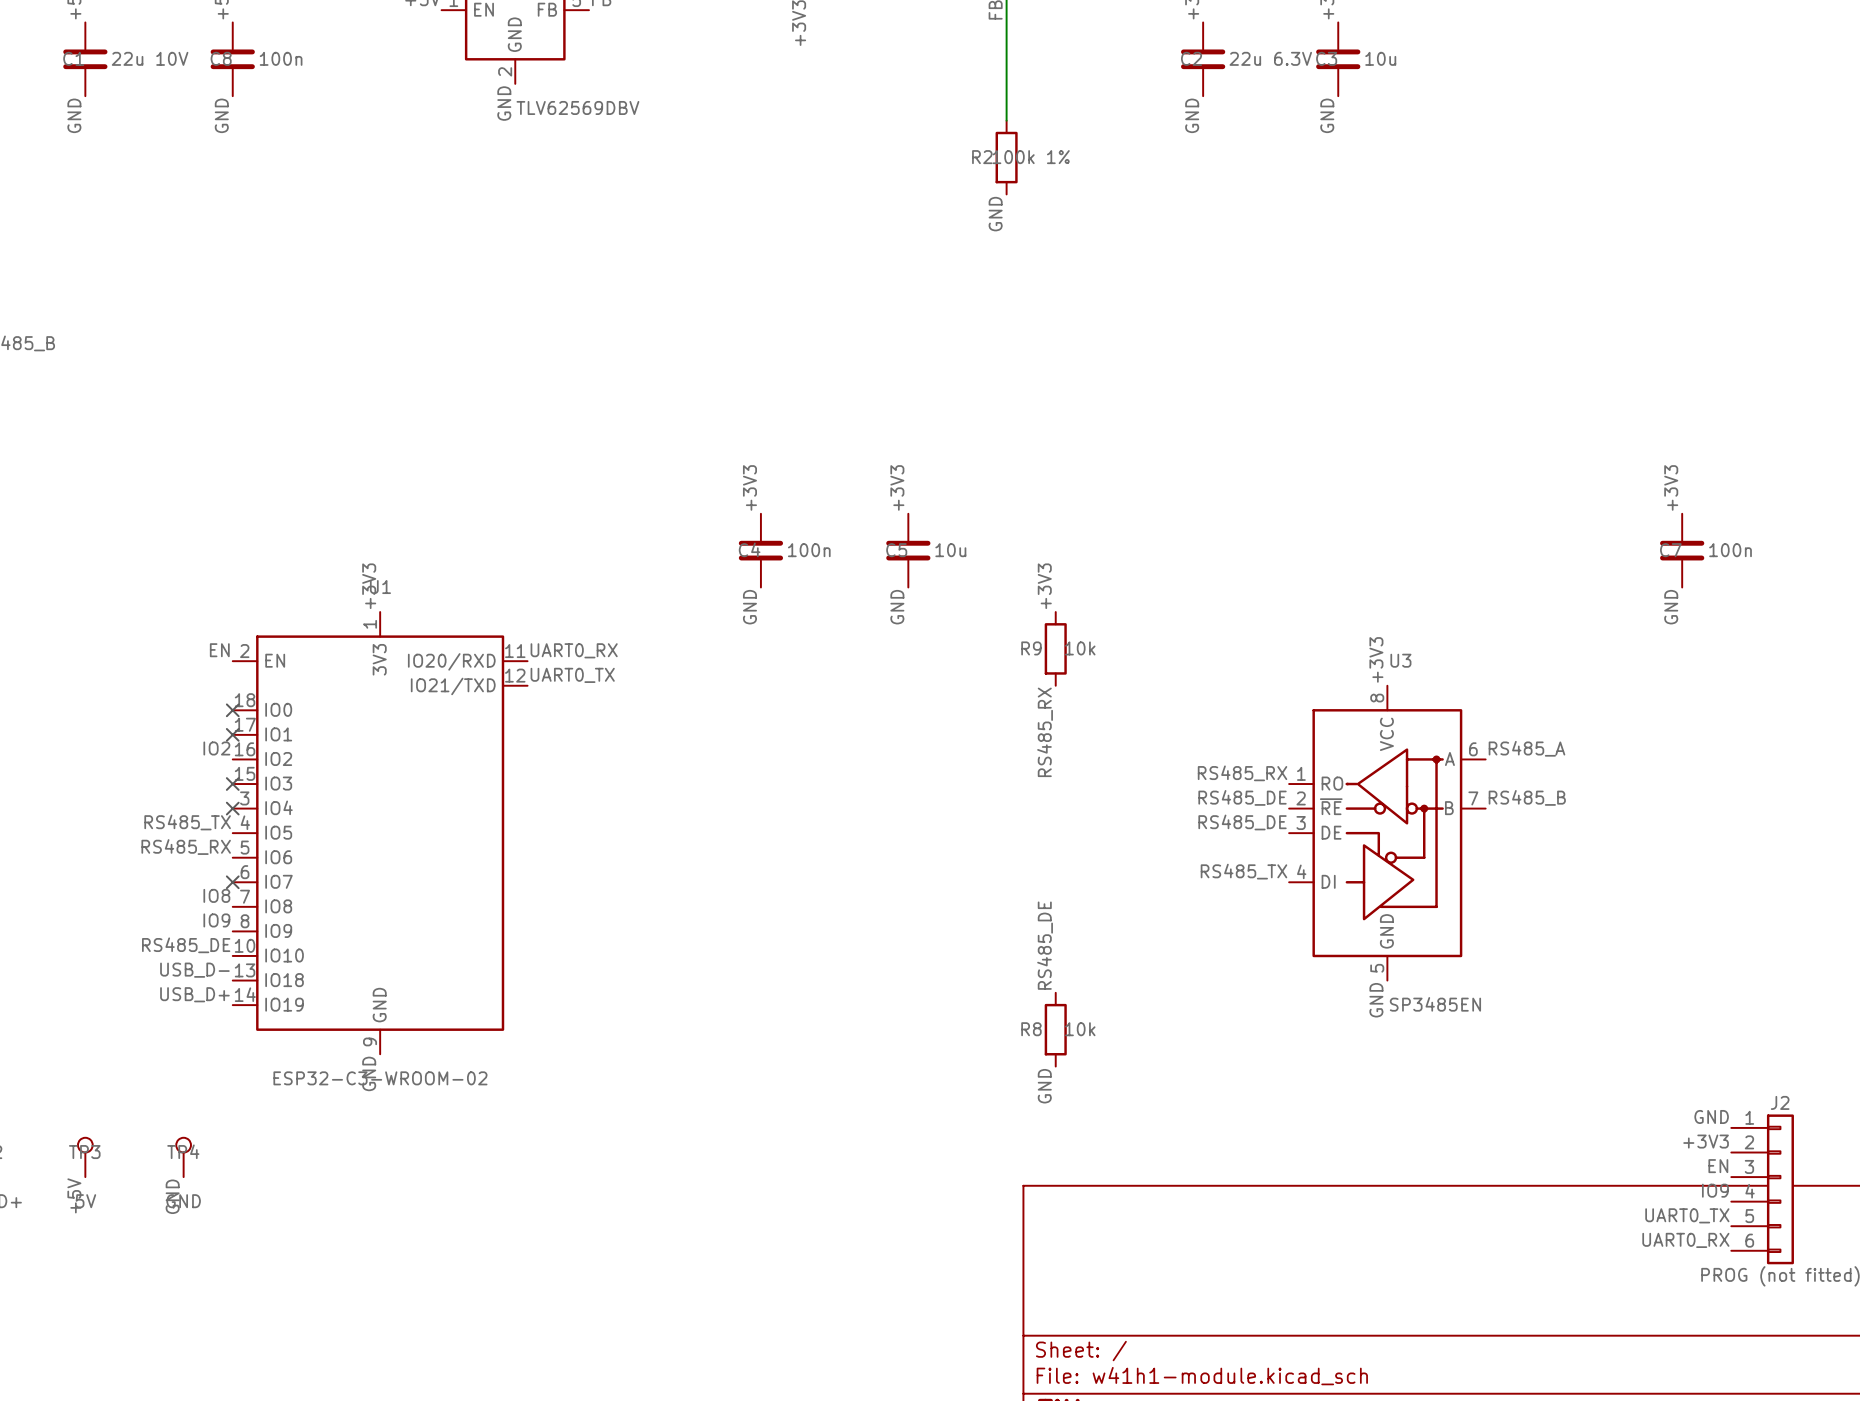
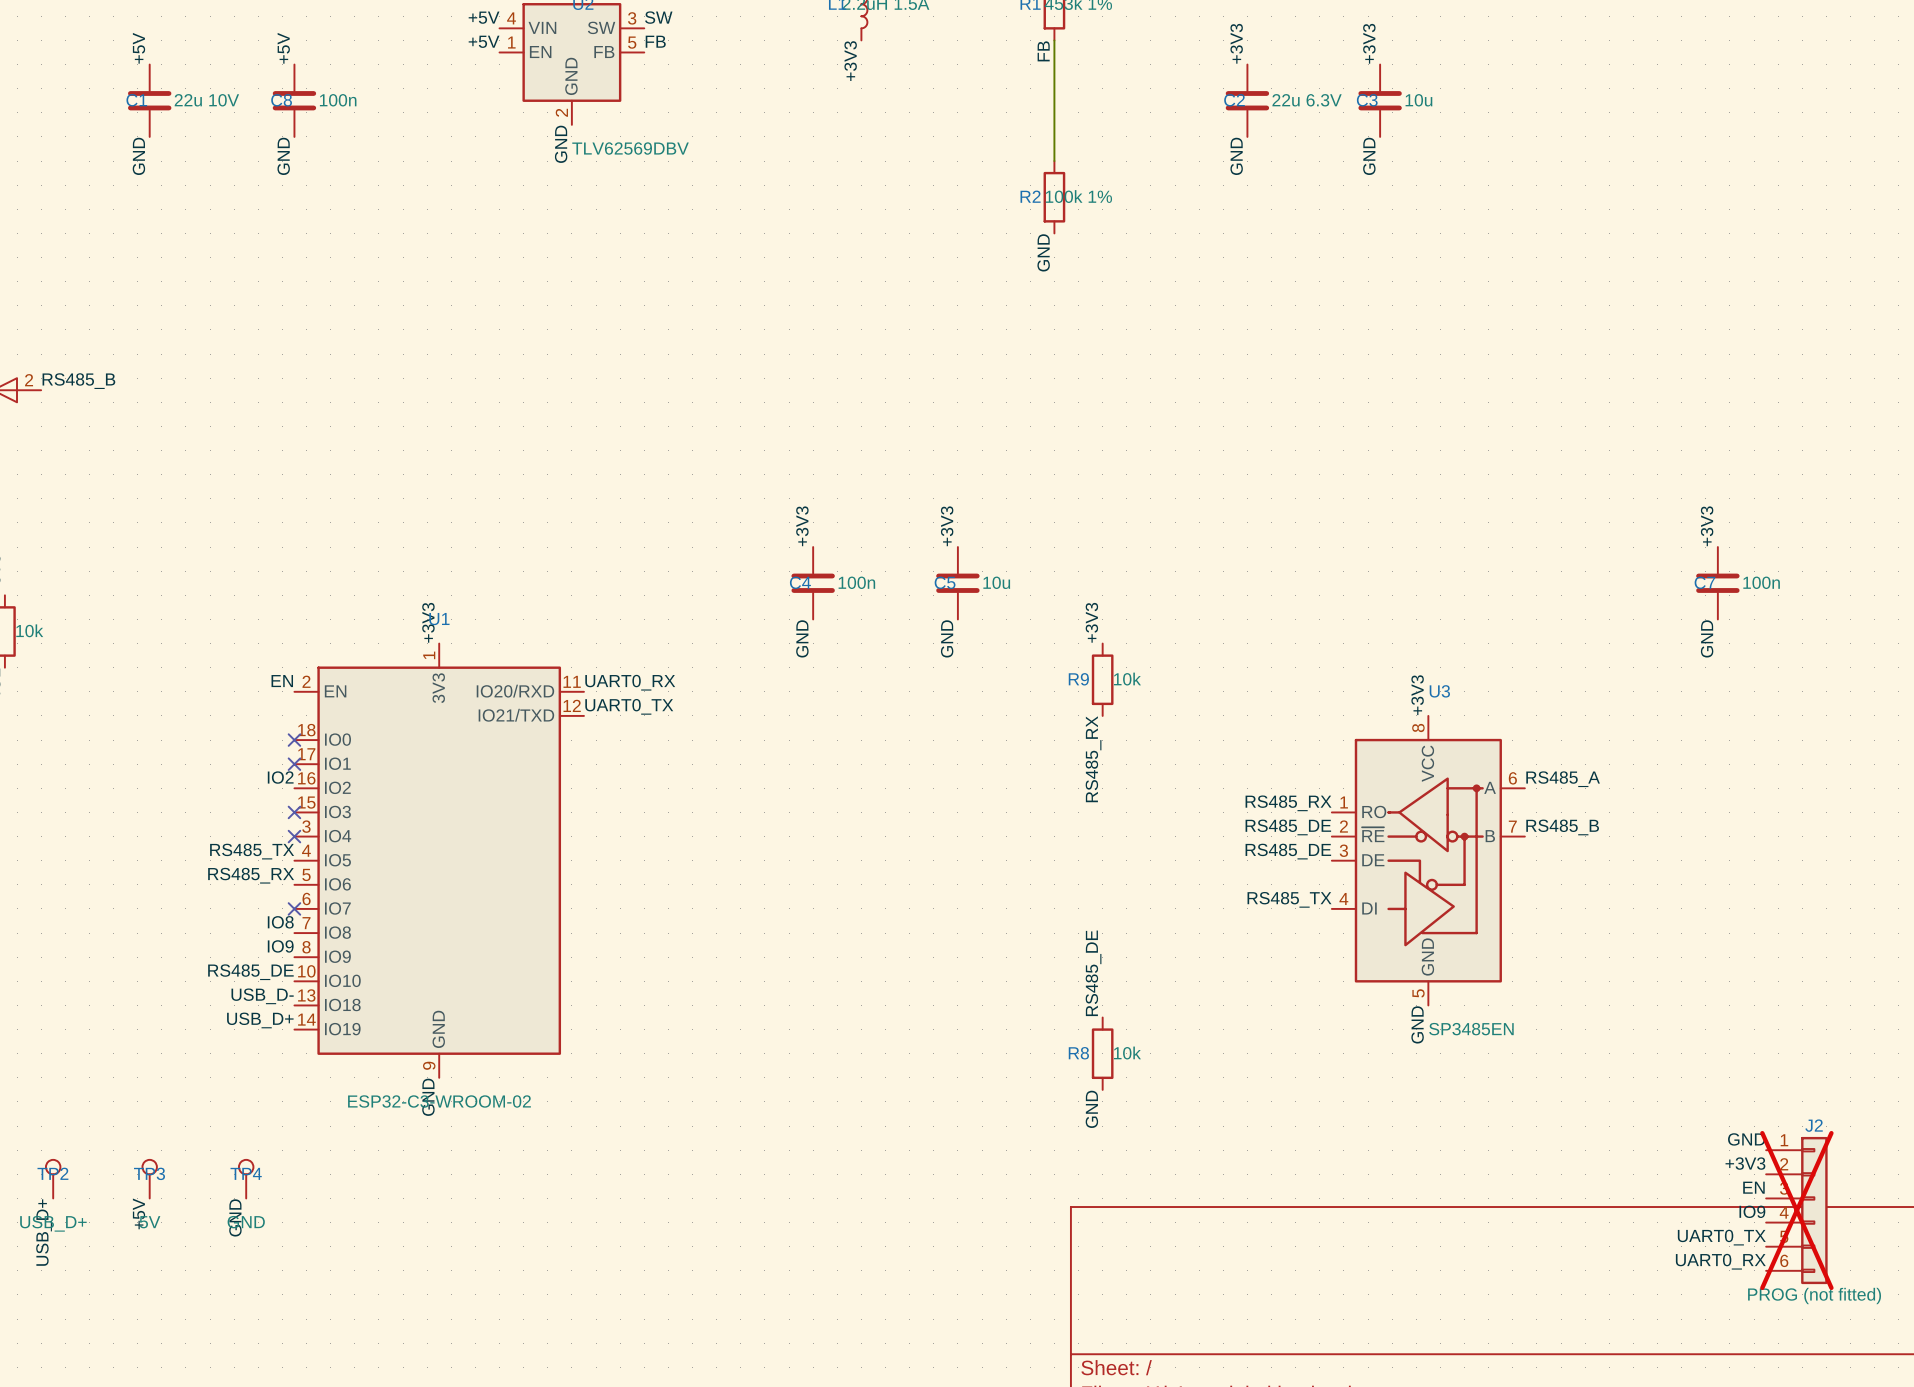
J2 do-not-place cross: none -> (1796, 1210)

